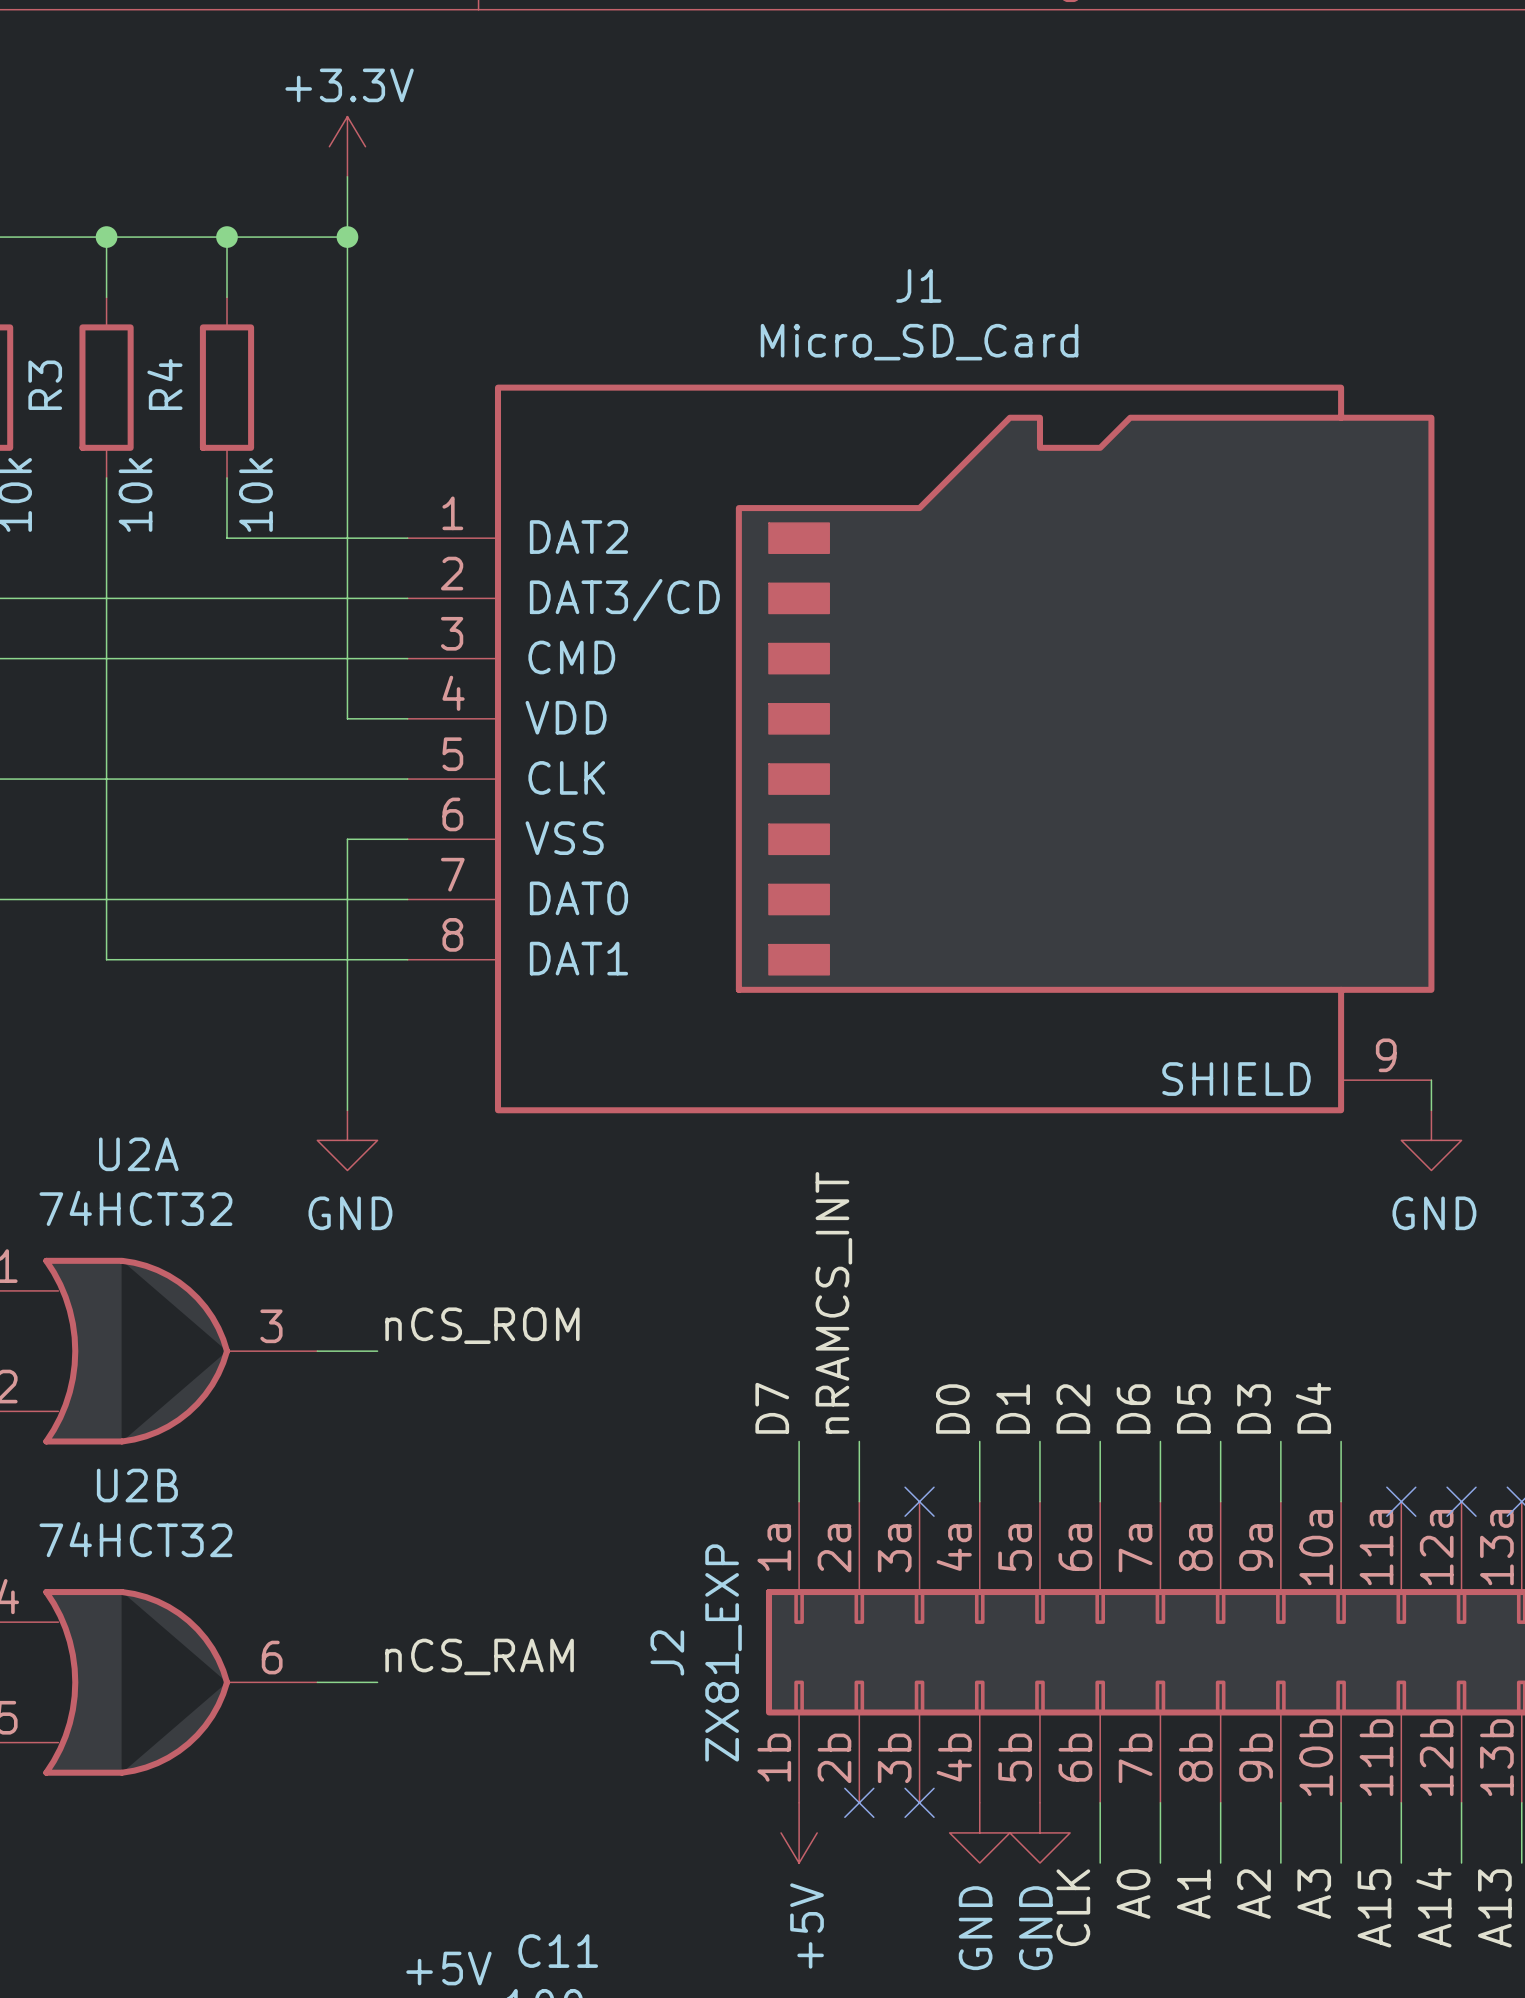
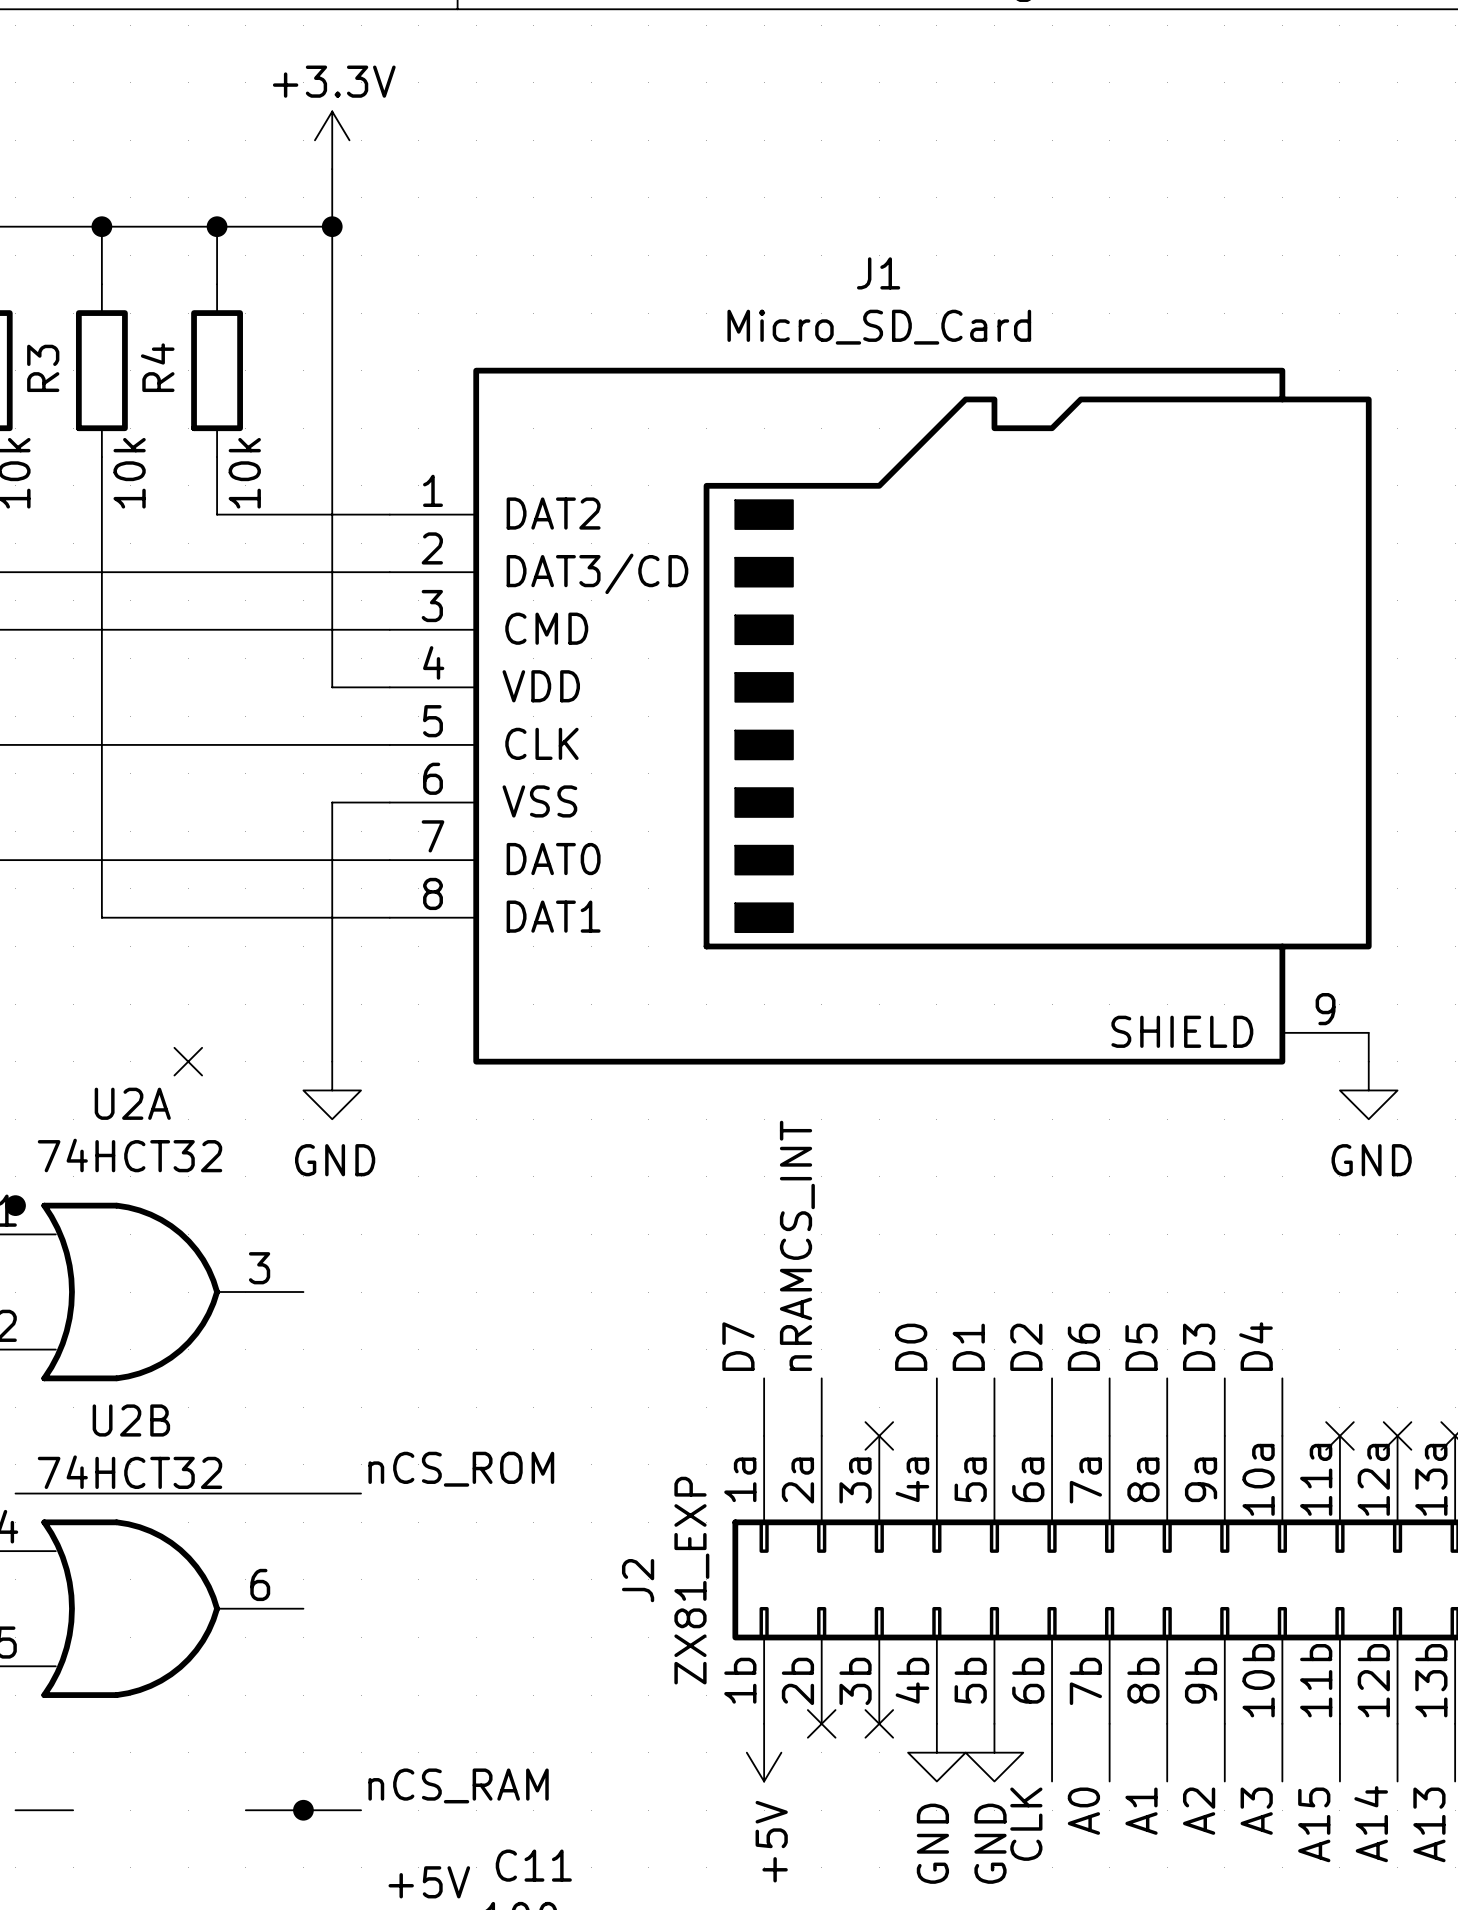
no-connect mark: none -> (188, 1061)
junction: none -> (15, 1205)
label position: nCS_ROM (482, 1325) -> nCS_ROM (461, 1469)
wire: (317, 1351) (377, 1351) -> none
wire: none -> (15, 1493) (361, 1493)
label position: nCS_RAM (479, 1656) -> nCS_RAM (458, 1785)
wire: (317, 1682) (377, 1682) -> (15, 1810) (73, 1810)
wire: none -> (245, 1810) (361, 1810)
junction: none -> (303, 1810)

